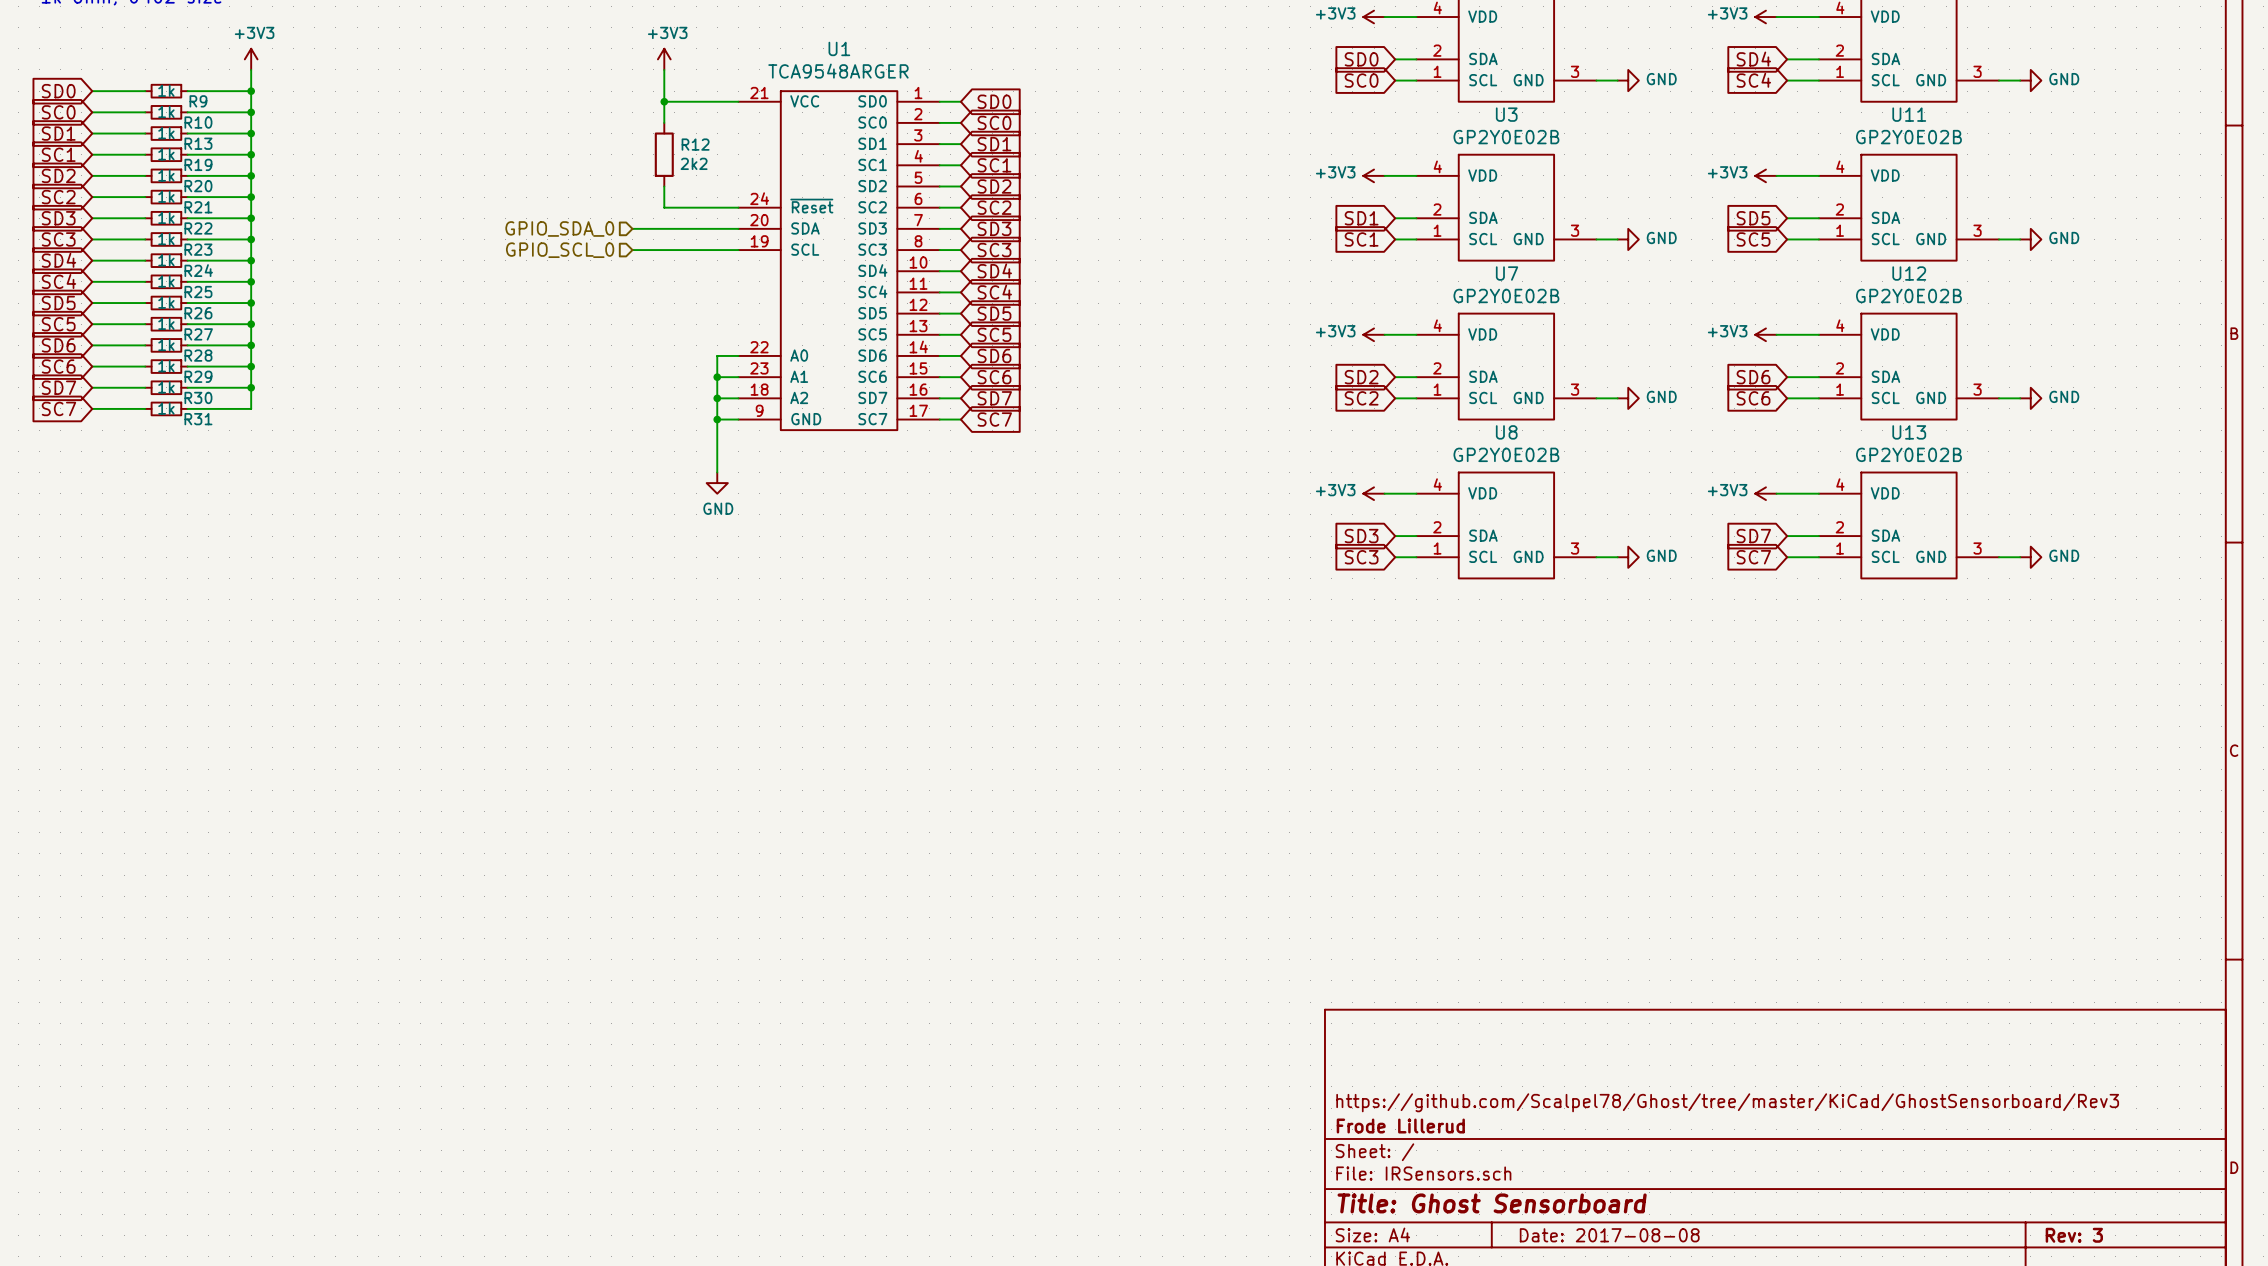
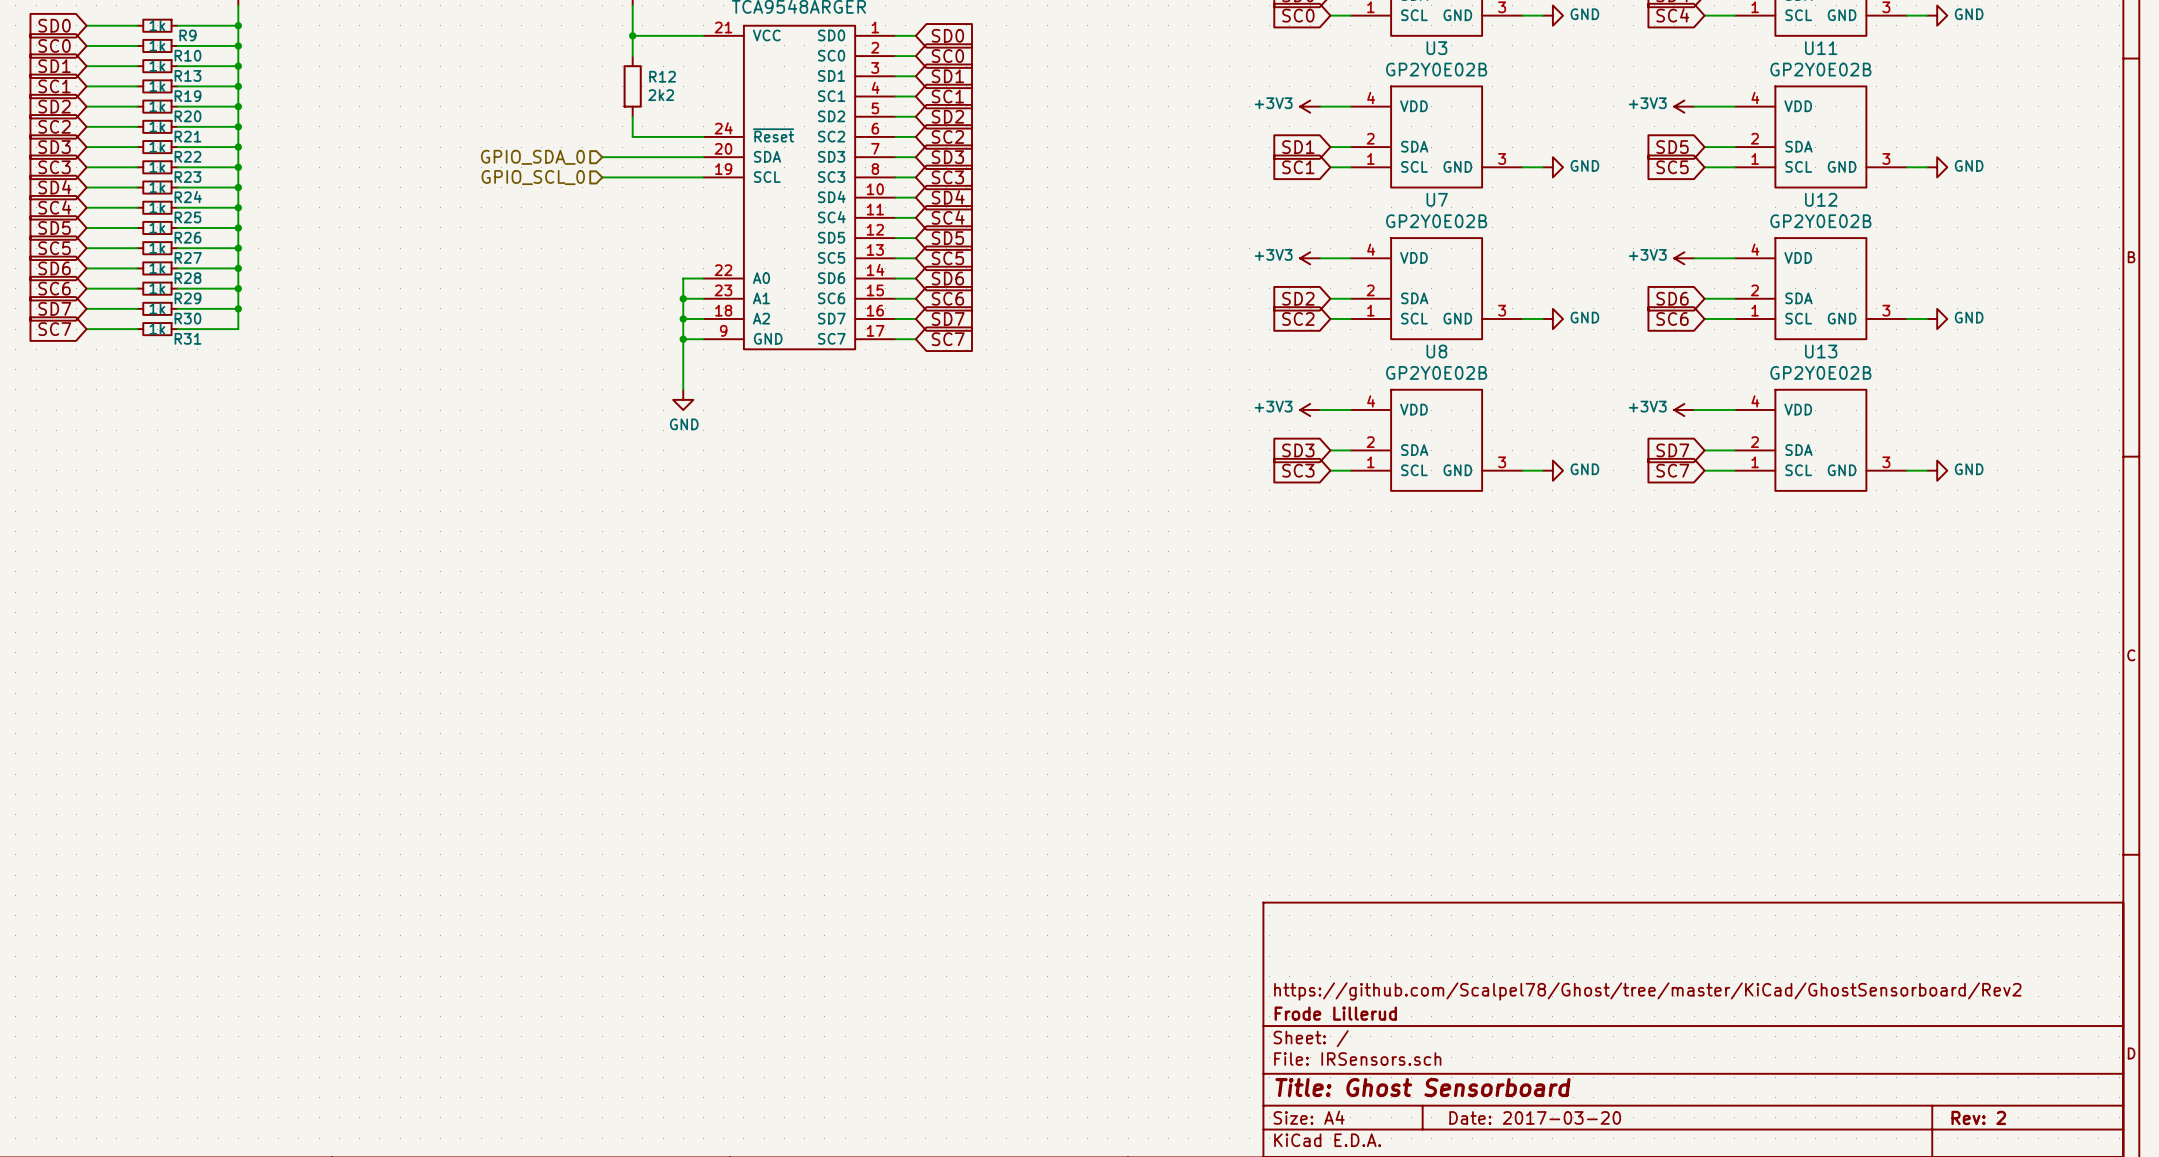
title block: https://github.com/Scalpel78/Ghost/tree/master/KiCad/GhostSensorboard/Rev3 (1727, 1102) -> https://github.com/Scalpel78/Ghost/tree/master/KiCad/GhostSensorboard/Rev2 (1647, 991)
title block: Date: 2017-08-08 (1609, 1235) -> Date: 2017-03-20 (1535, 1117)
title block: Rev: 3 (2074, 1235) -> Rev: 2 (1978, 1117)

